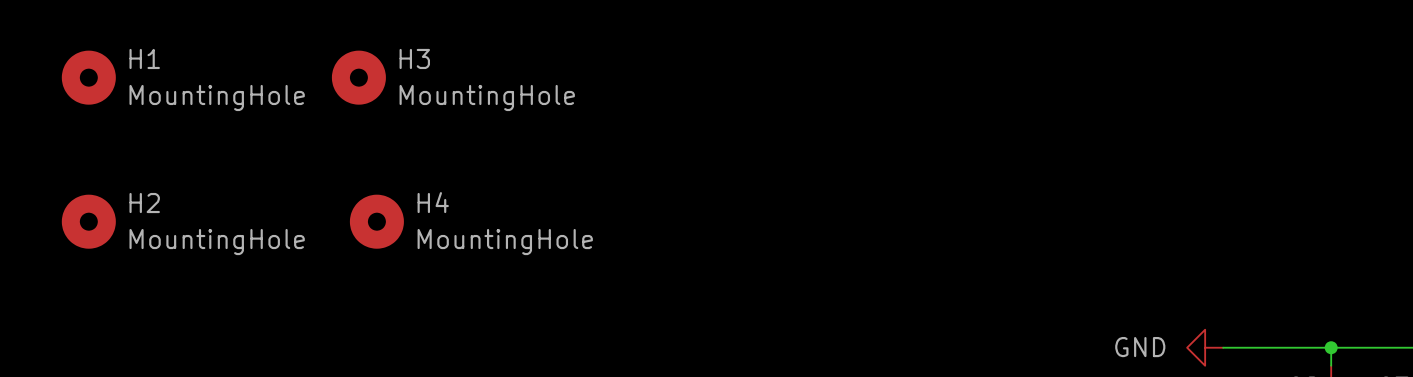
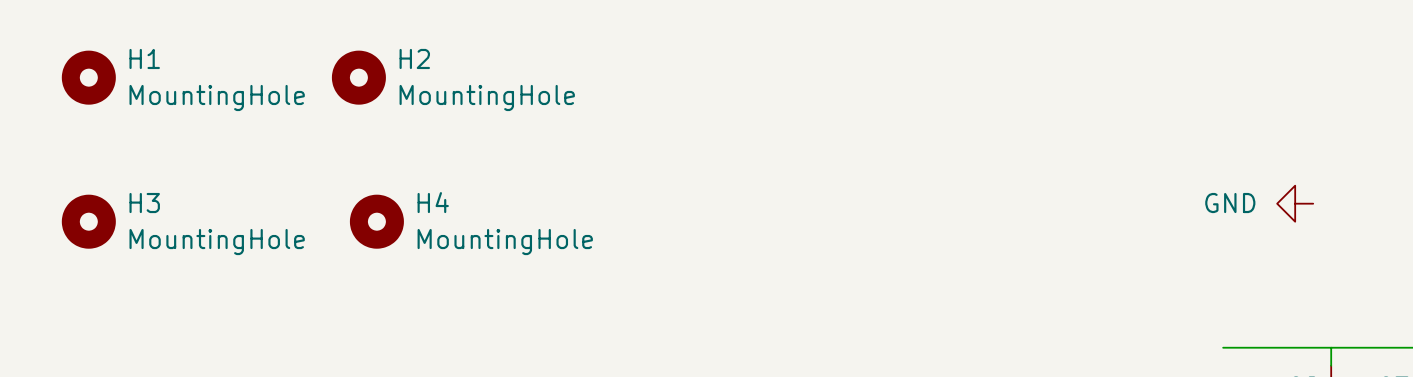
H3 name: H3 (414, 58) -> H2 (414, 58)
H2 name: H2 (144, 203) -> H3 (144, 203)
power symbol position: GND (1205, 347) -> GND (1295, 203)
junction: (1331, 347) -> none

